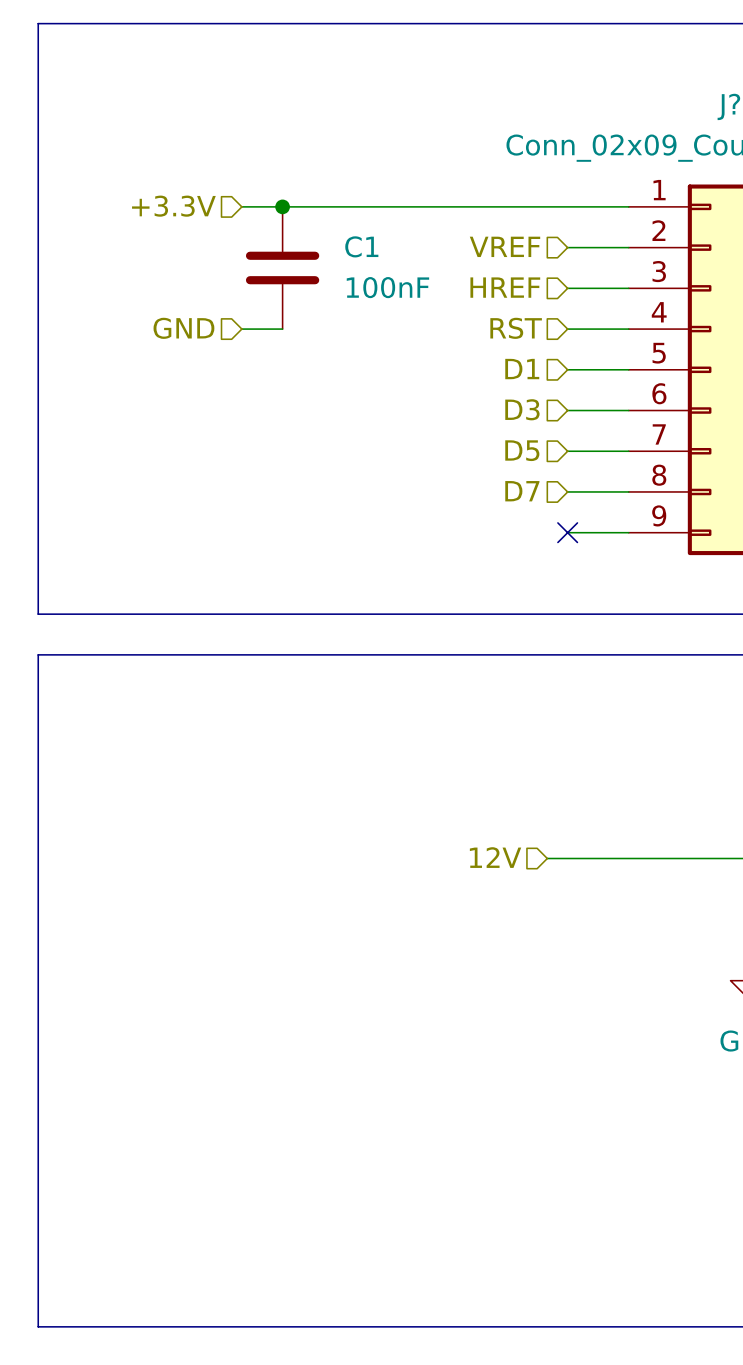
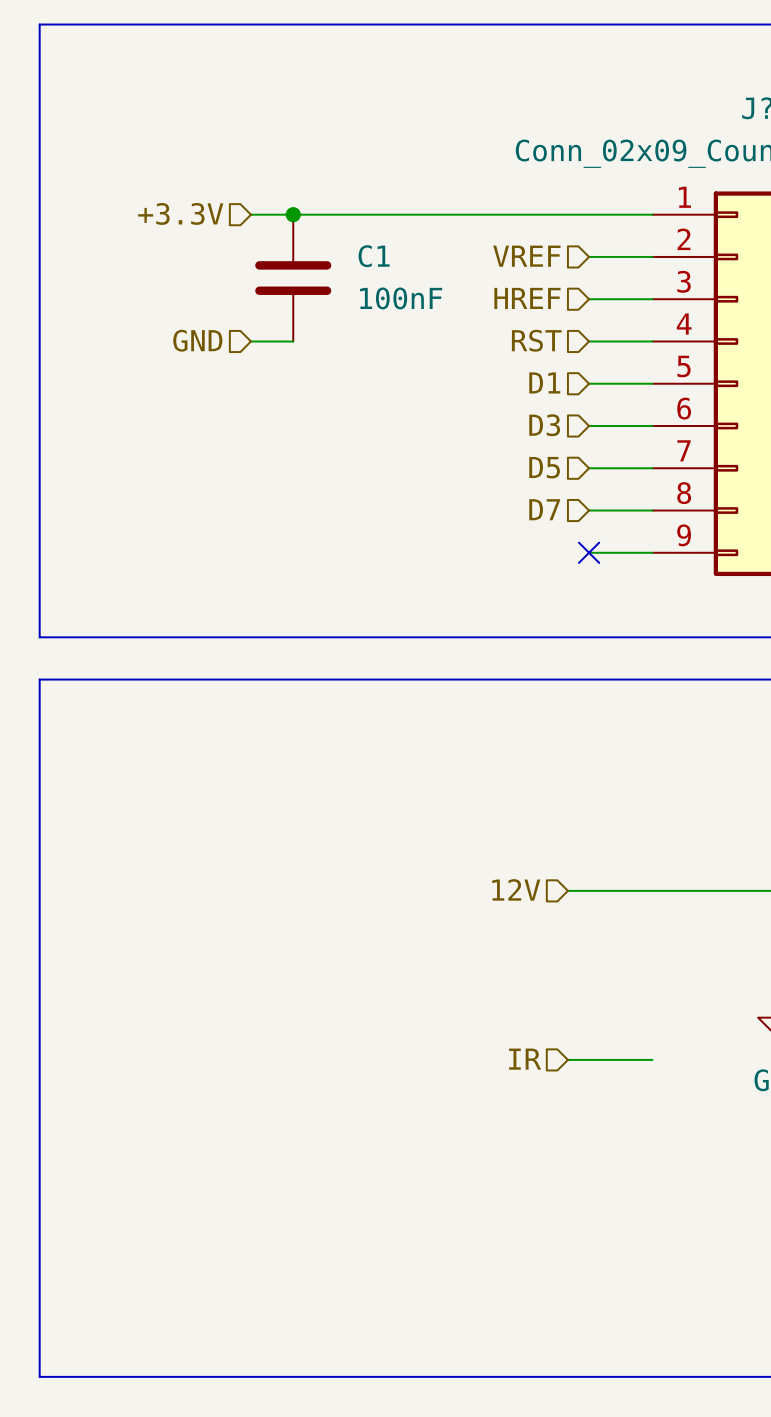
hierarchical label: none -> IR (525, 1059)
wire: none -> (567, 1059) (652, 1059)

